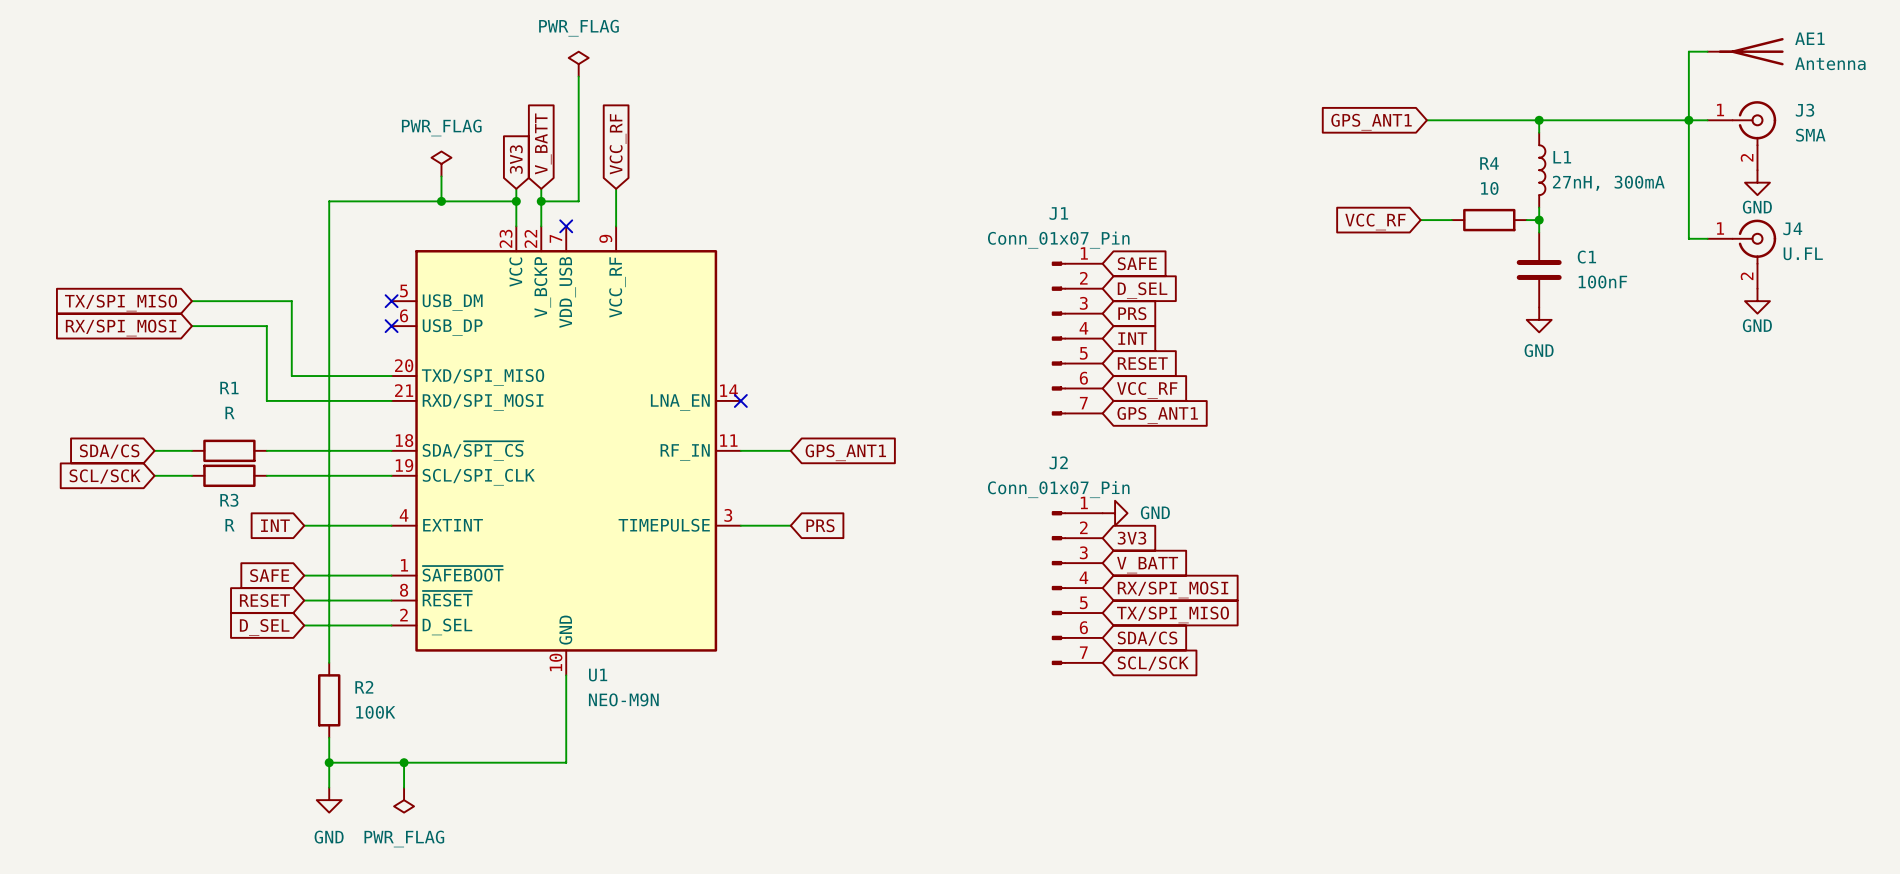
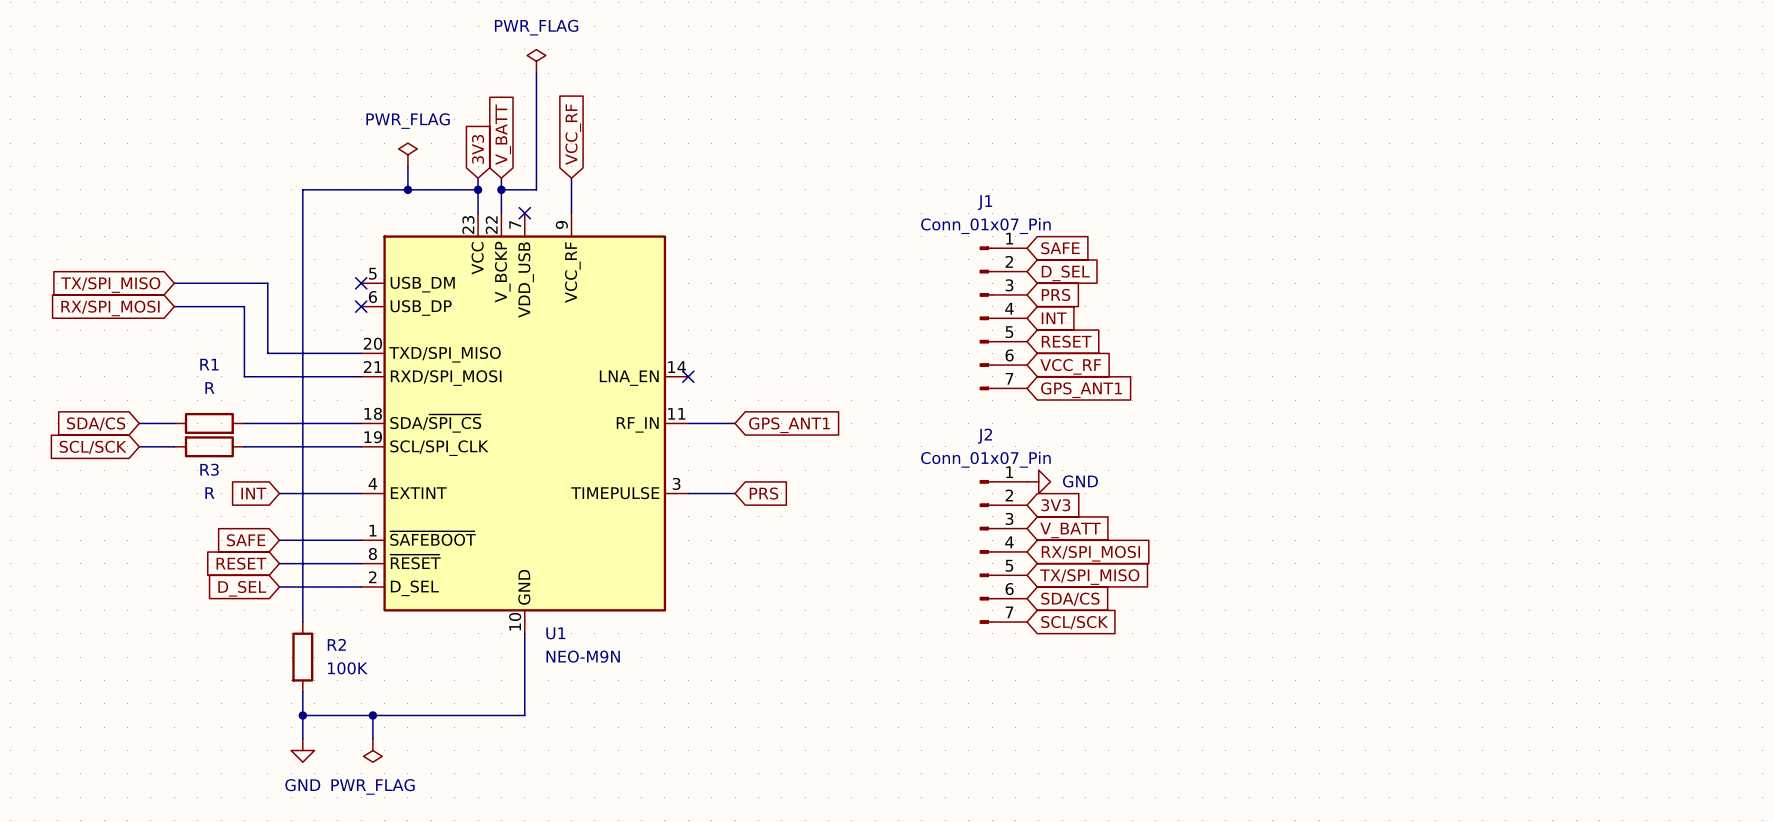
wire: (1707, 51) (1688, 51) (1688, 238) (1707, 238) -> none
AE1: Antenna (1745, 51) -> none
wire: (1426, 120) (1707, 120) -> none
wire: (1539, 120) (1539, 132) -> none
junction: (1539, 120) -> none
junction: (1688, 120) -> none
global label: GPS_ANT1 (1371, 122) -> none
J3: SMA (1741, 135) -> none
L1: 27nH, 300mA (1542, 170) -> none
power symbol: GND (1757, 182) -> none
wire: (1539, 207) (1539, 232) -> none
wire: (1420, 220) (1451, 220) -> none
R4: 10 (1489, 220) -> none
wire: (1526, 220) (1539, 220) -> none
junction: (1539, 220) -> none
global label: VCC_RF (1375, 221) -> none
J4: U.FL (1741, 254) -> none
C1: 100nF (1539, 269) -> none
power symbol: GND (1757, 301) -> none
power symbol: GND (1539, 319) -> none

